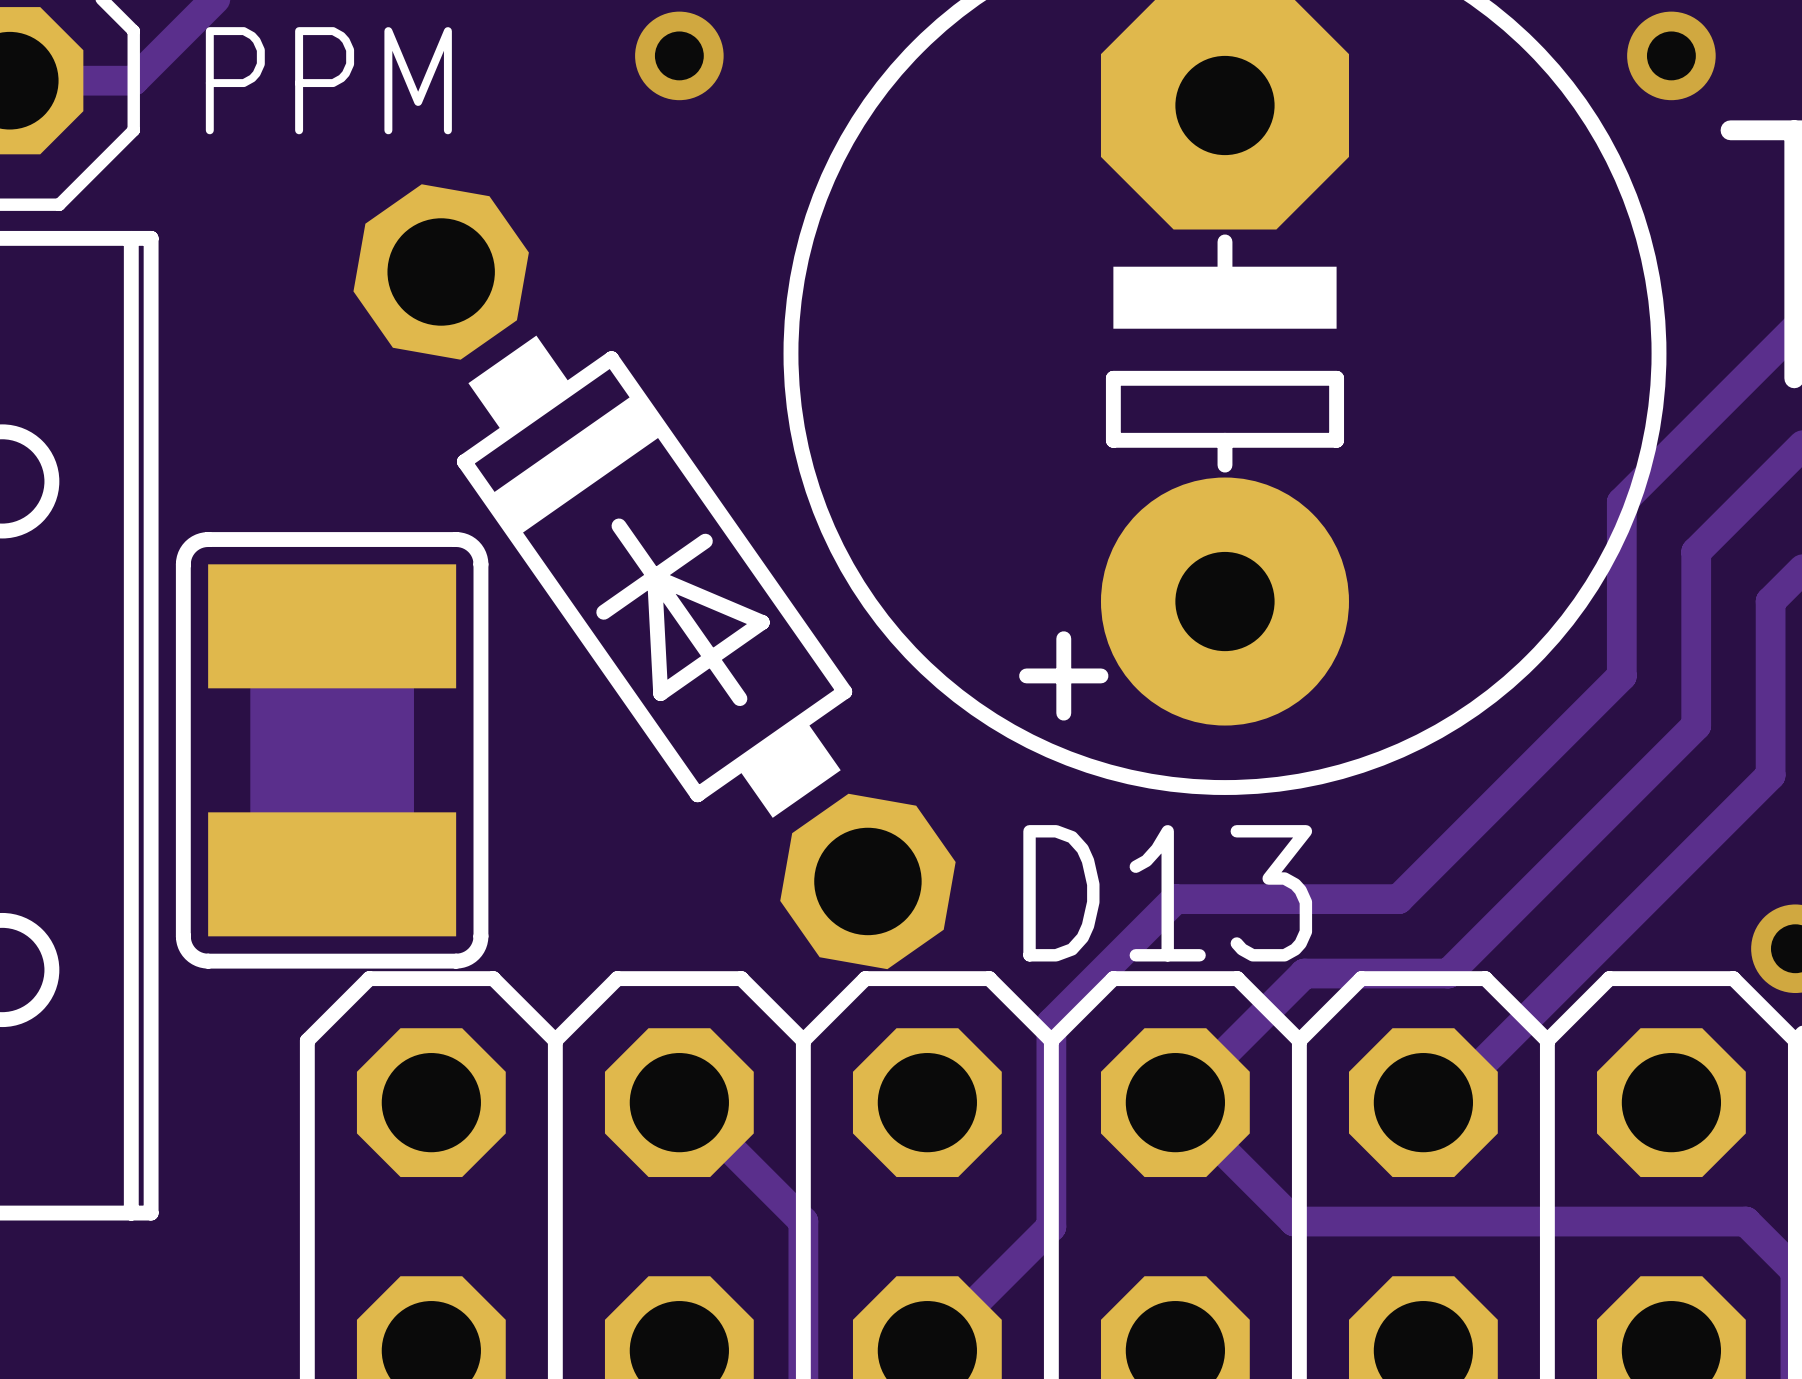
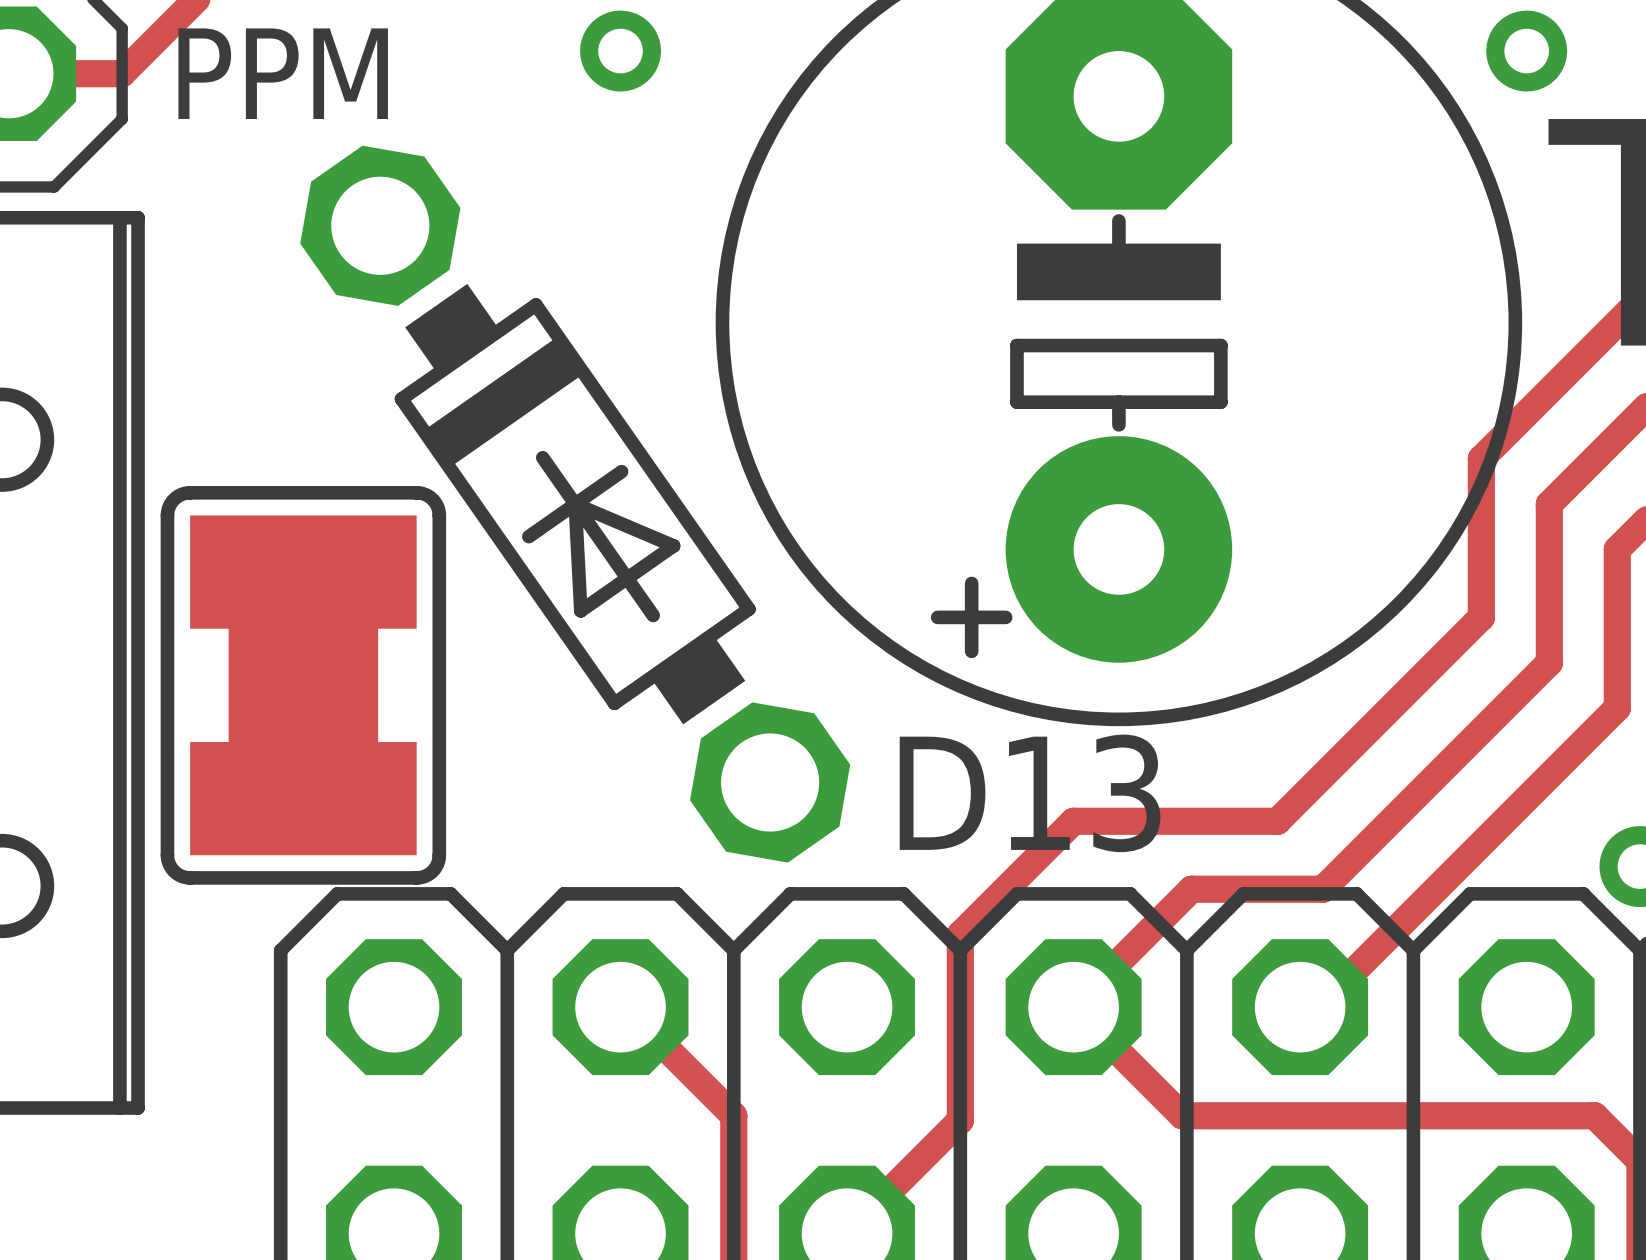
D13 position: (654, 576) -> (575, 504)

